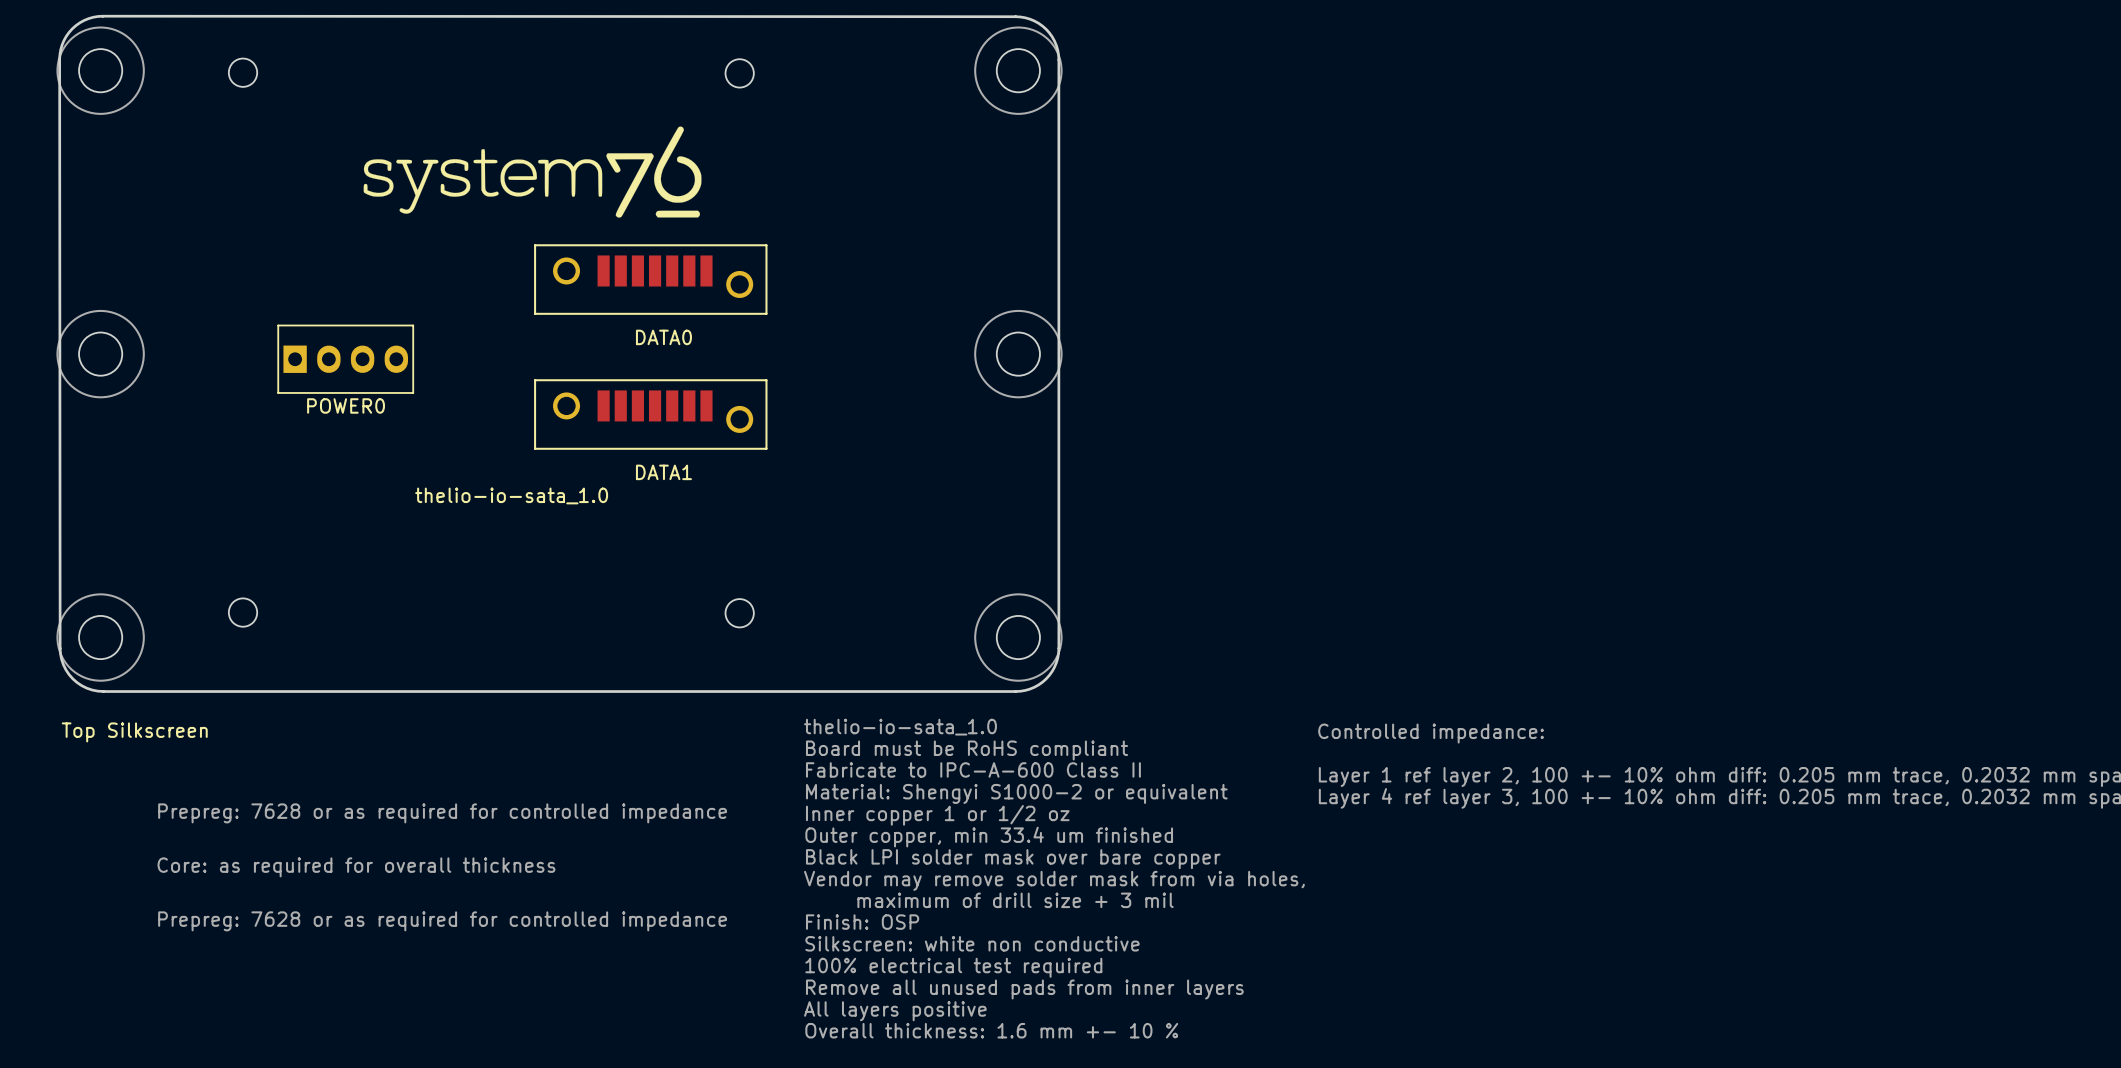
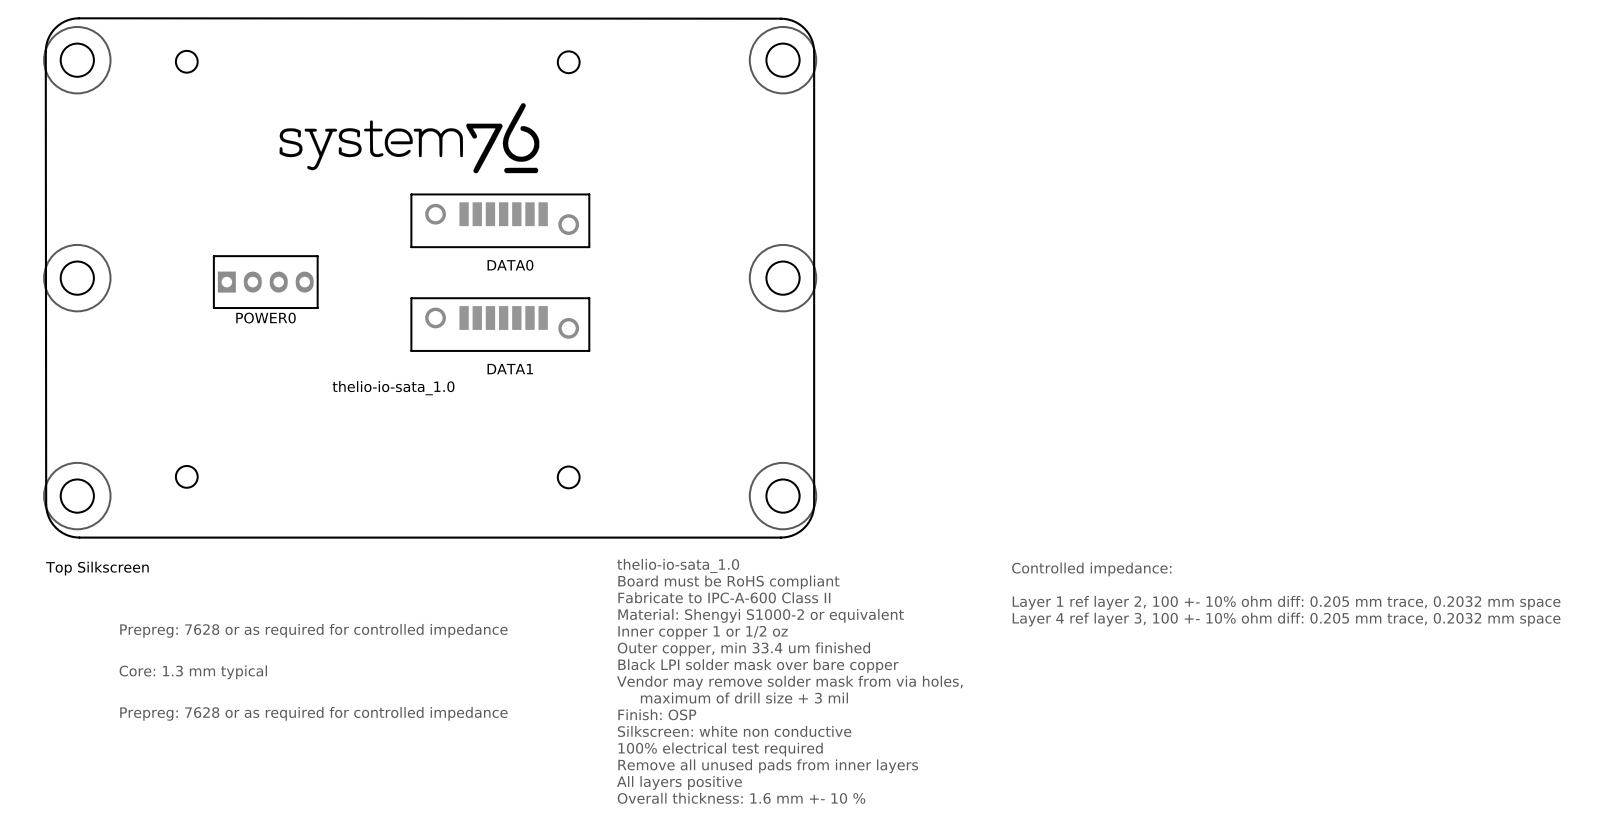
text: Core: as required for overall thickness (356, 867) -> Core: 1.3 mm typical (193, 672)

